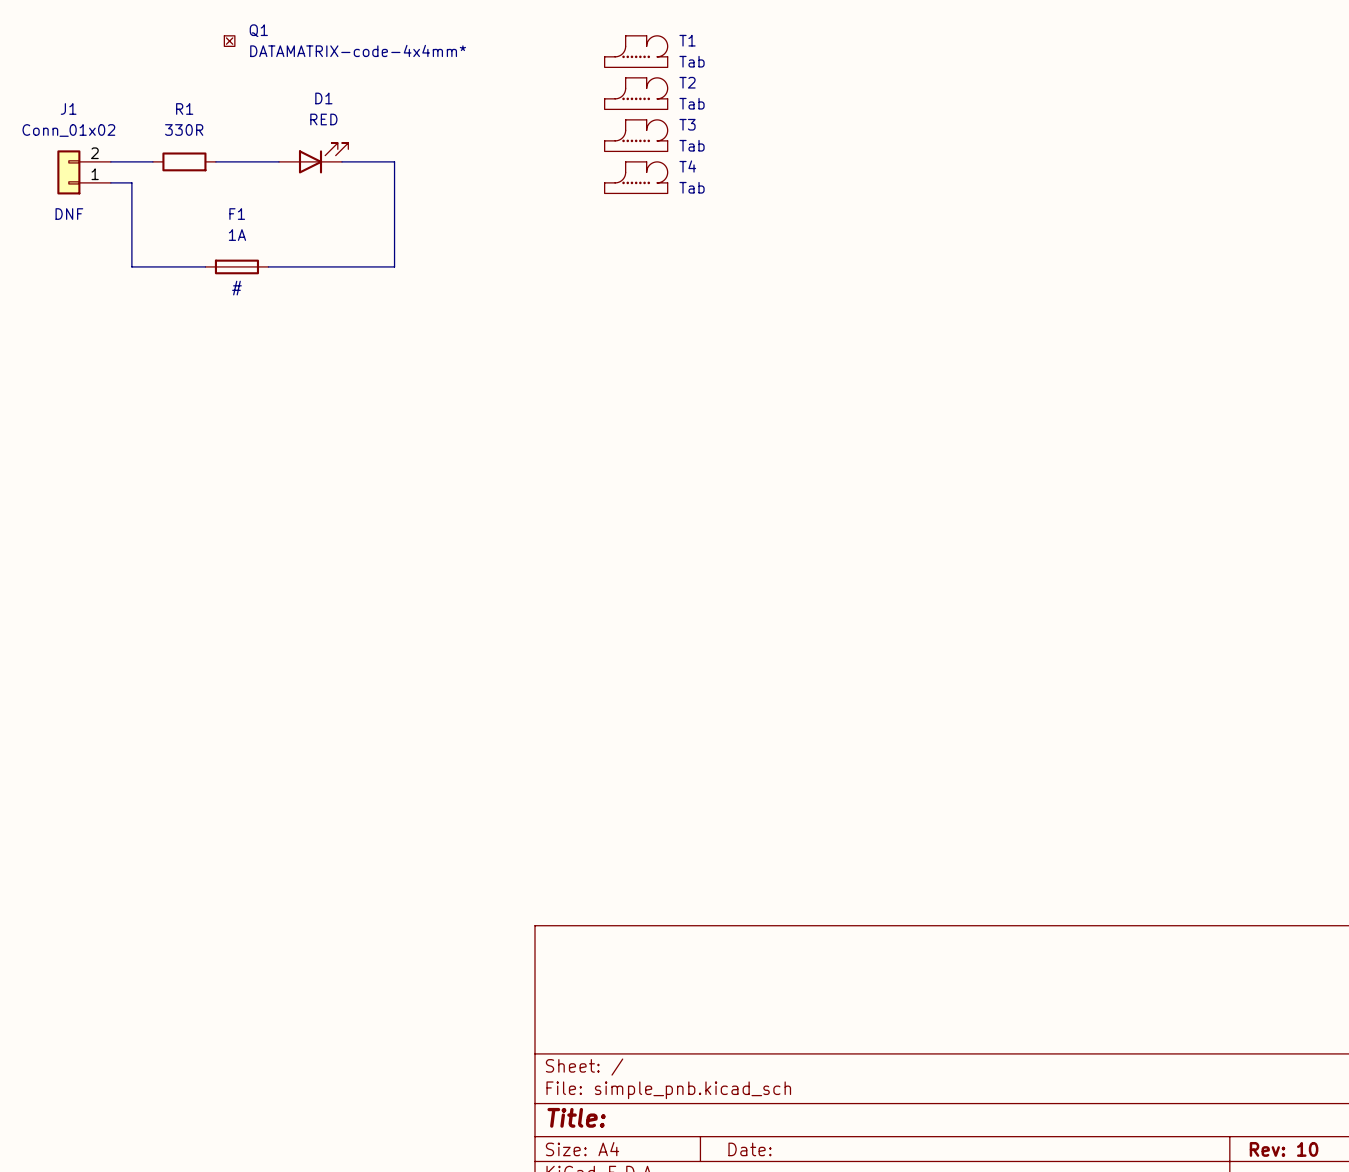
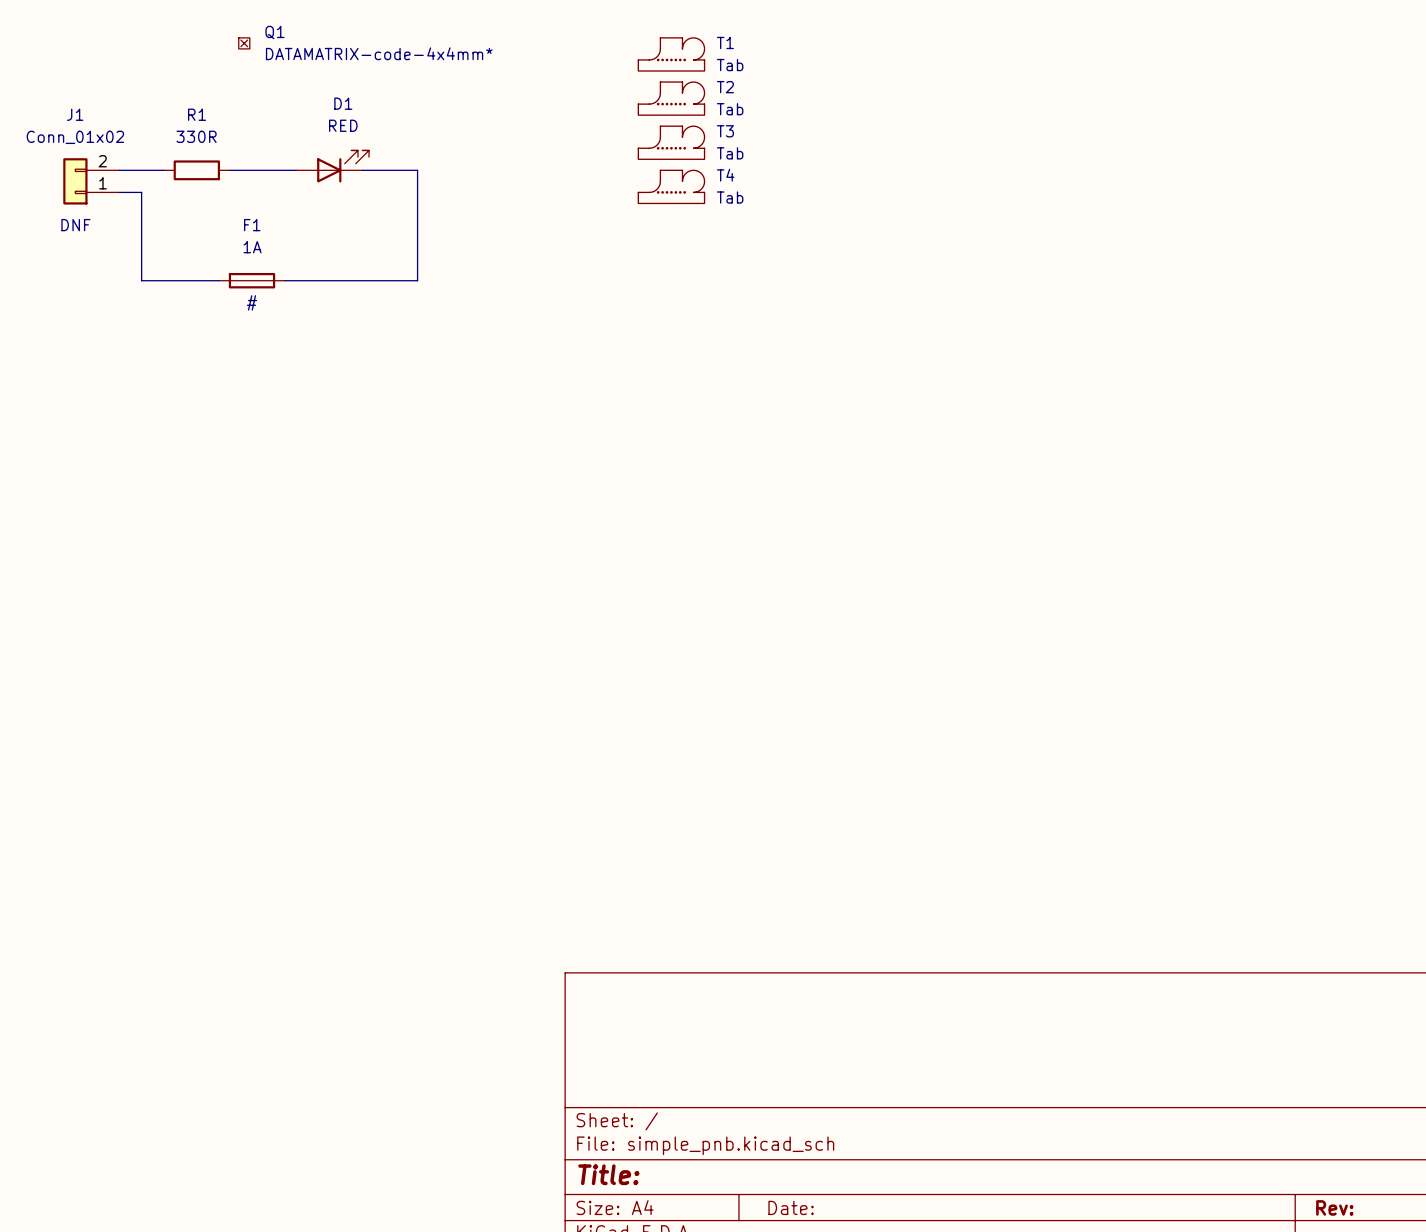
title block: Rev: 10 (1284, 1149) -> Rev: (1334, 1207)

